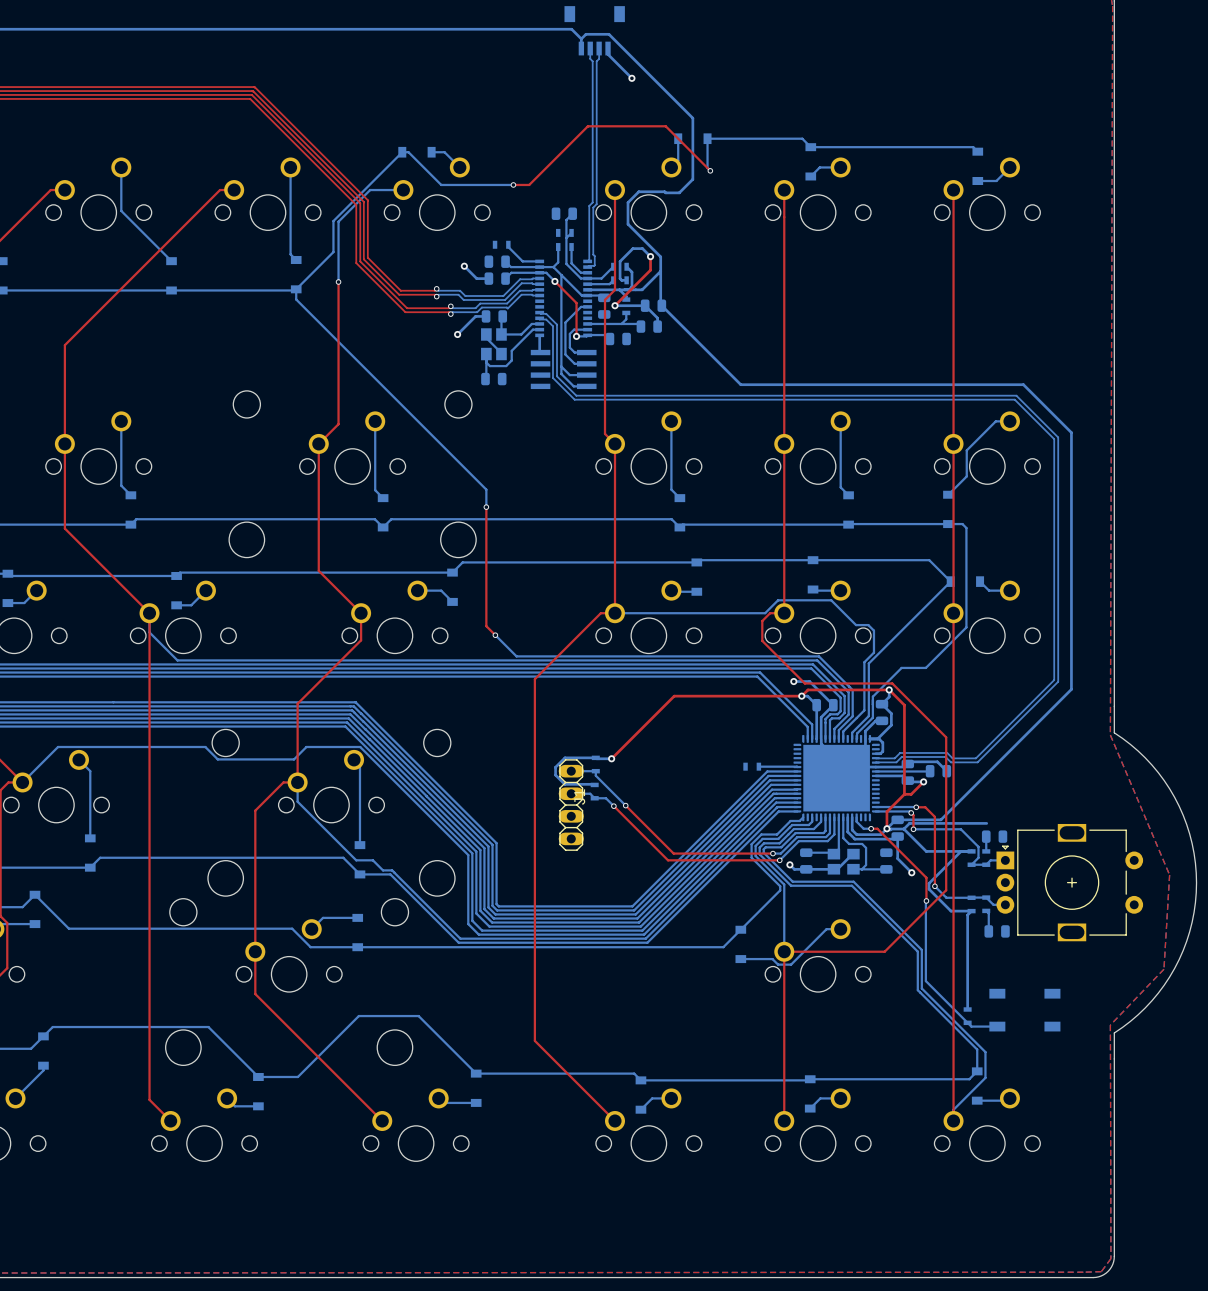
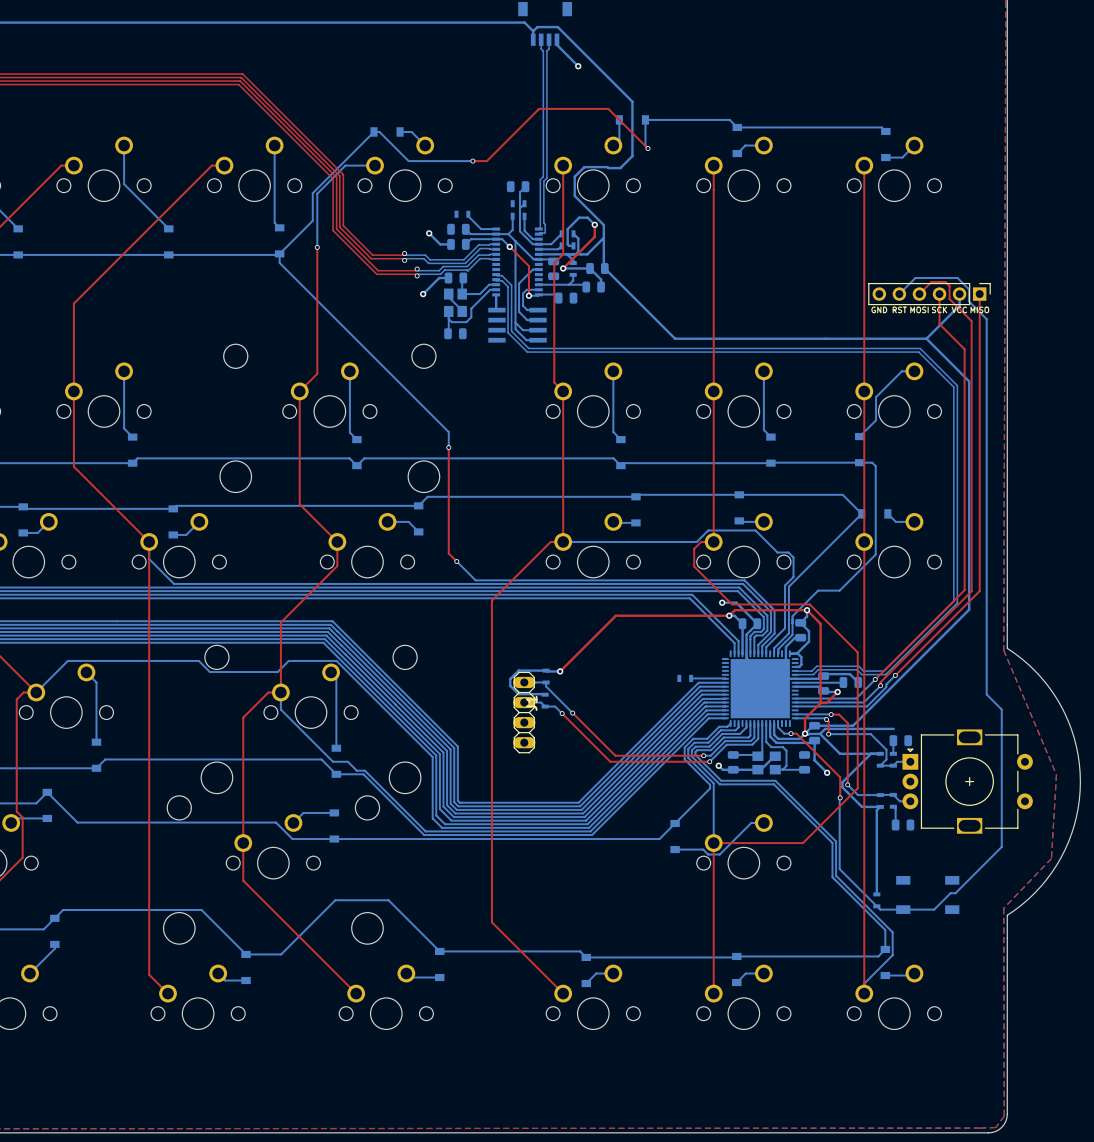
bottom track: none -> (899, 294) (915, 278) (957, 278) (968, 289) (968, 301) (986, 319) (986, 694) (1001, 709) (1001, 846) (955, 893) (950, 893) (934, 909) (903, 909)
top track: none -> (919, 294) (931, 282) (945, 282) (949, 286) (949, 299) (971, 321) (971, 591) (880, 682) (880, 685)
part: none -> (929, 294)
top track: none -> (939, 294) (939, 324) (964, 349) (964, 590) (875, 679)
bottom track: none -> (959, 294) (959, 305) (926, 338)
top track: none -> (979, 294) (979, 591) (895, 675)
bottom track: none -> (895, 675) (867, 706) (795, 706)
via: none -> (895, 675)
bottom track: none -> (875, 679) (856, 698) (795, 698)
via: none -> (875, 679)
bottom track: none -> (880, 685) (863, 702) (795, 702)
via: none -> (880, 685)

